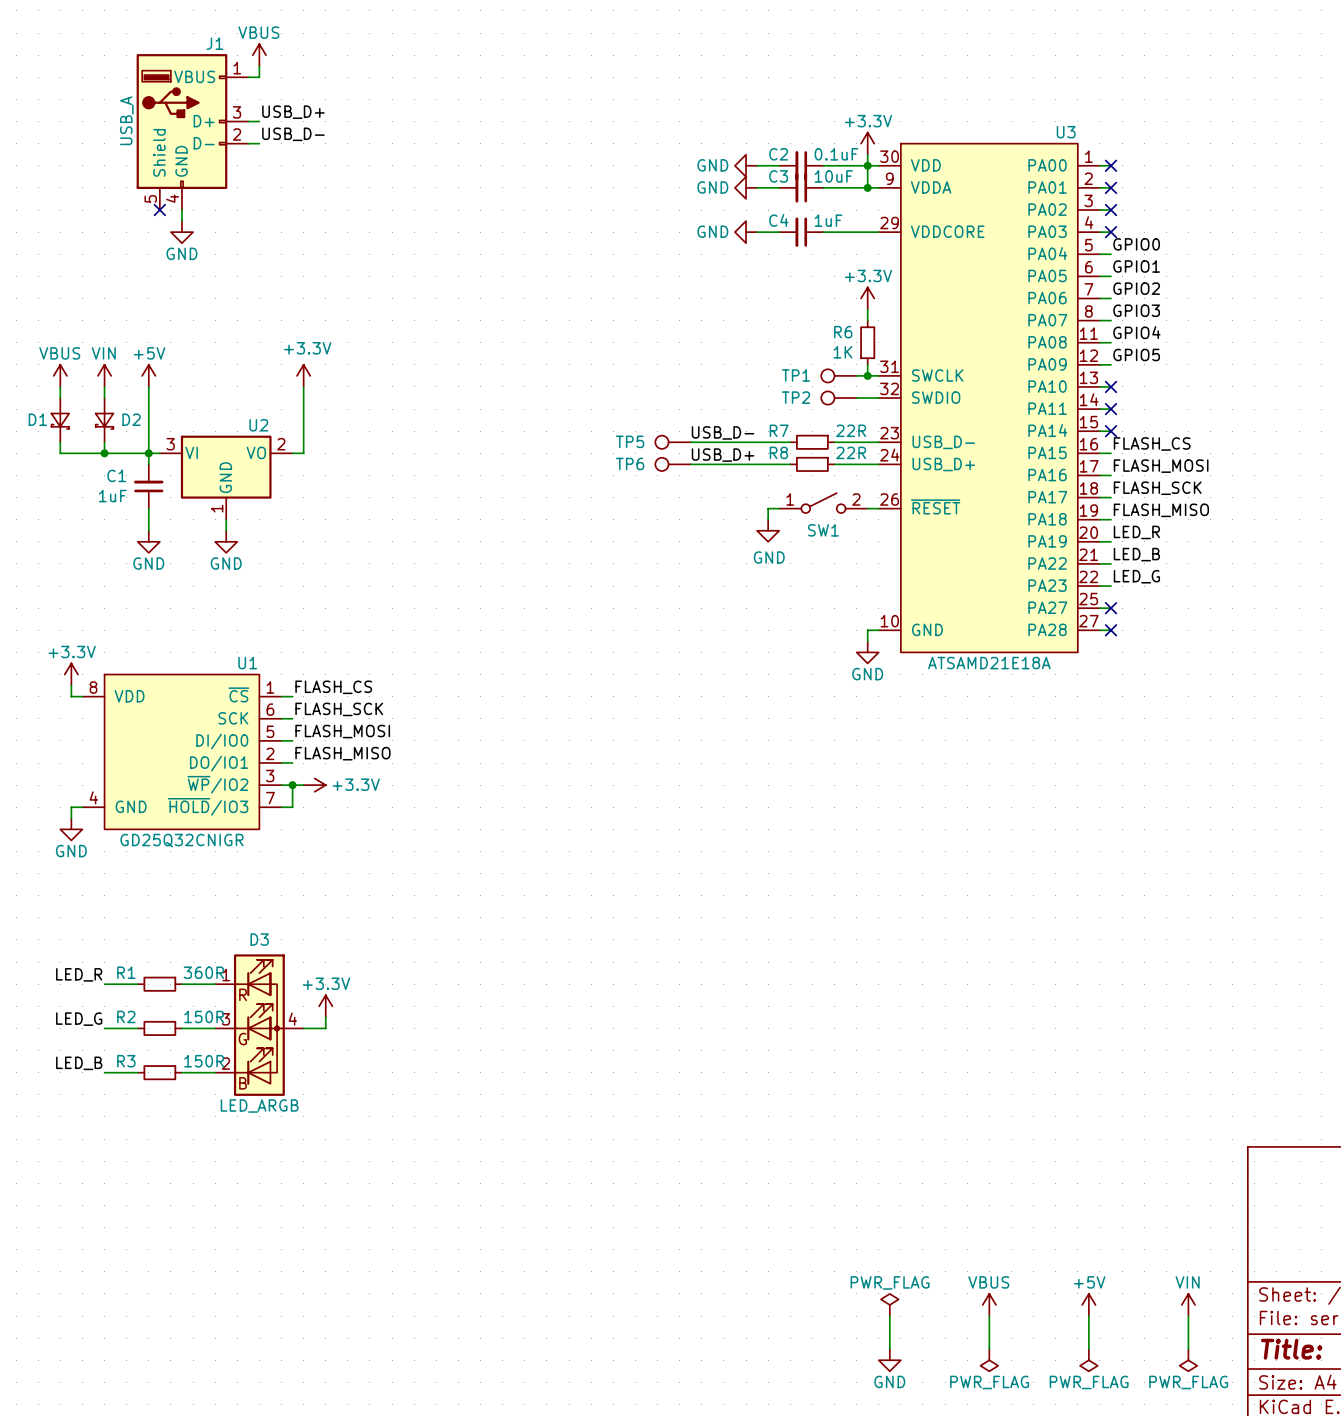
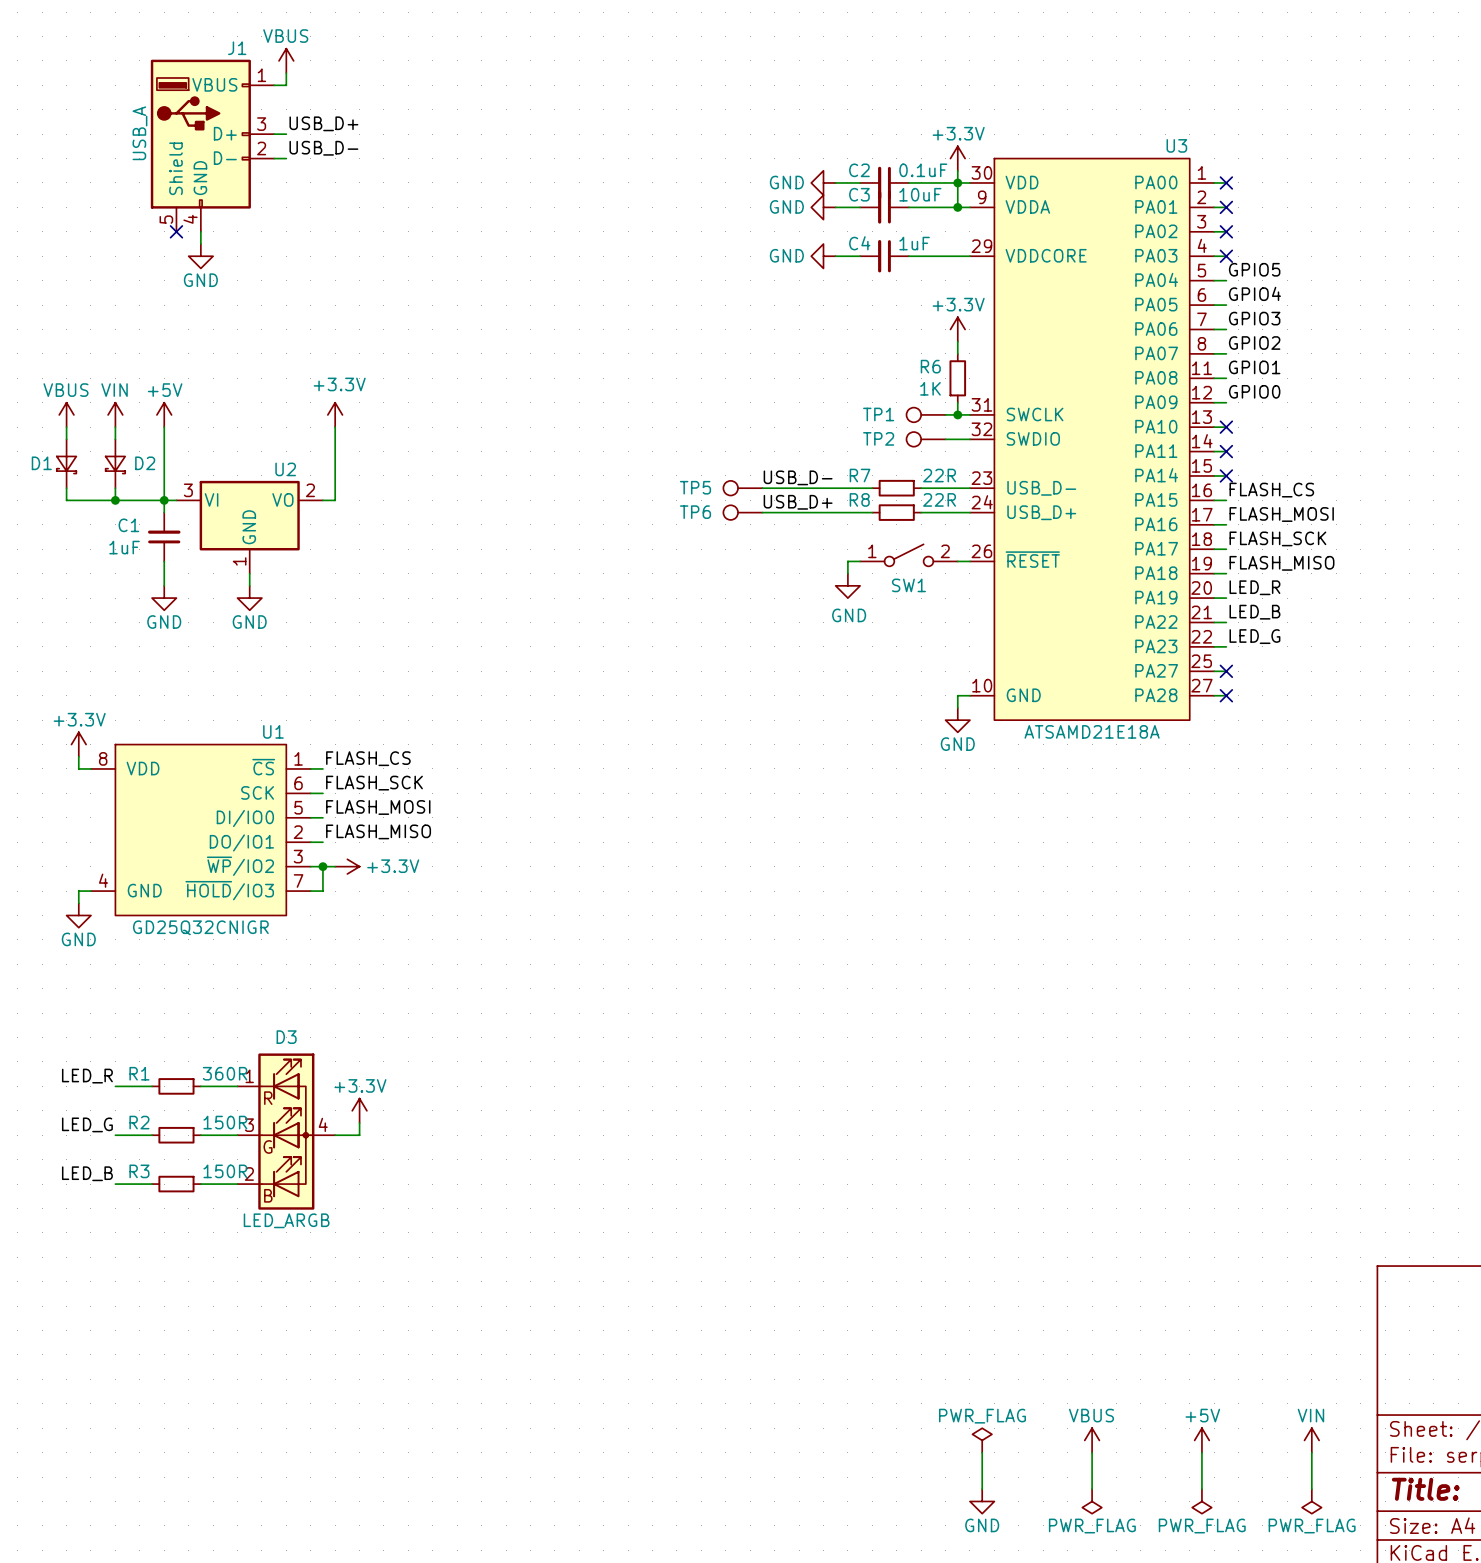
label: GPIO0 (1136, 244) -> GPIO5 (1254, 269)
label: GPIO1 (1136, 266) -> GPIO4 (1254, 293)
label: GPIO2 (1136, 288) -> GPIO3 (1254, 318)
label: GPIO3 (1136, 310) -> GPIO2 (1254, 343)
label: GPIO4 (1136, 332) -> GPIO1 (1254, 367)
label: GPIO5 (1136, 354) -> GPIO0 (1254, 391)

